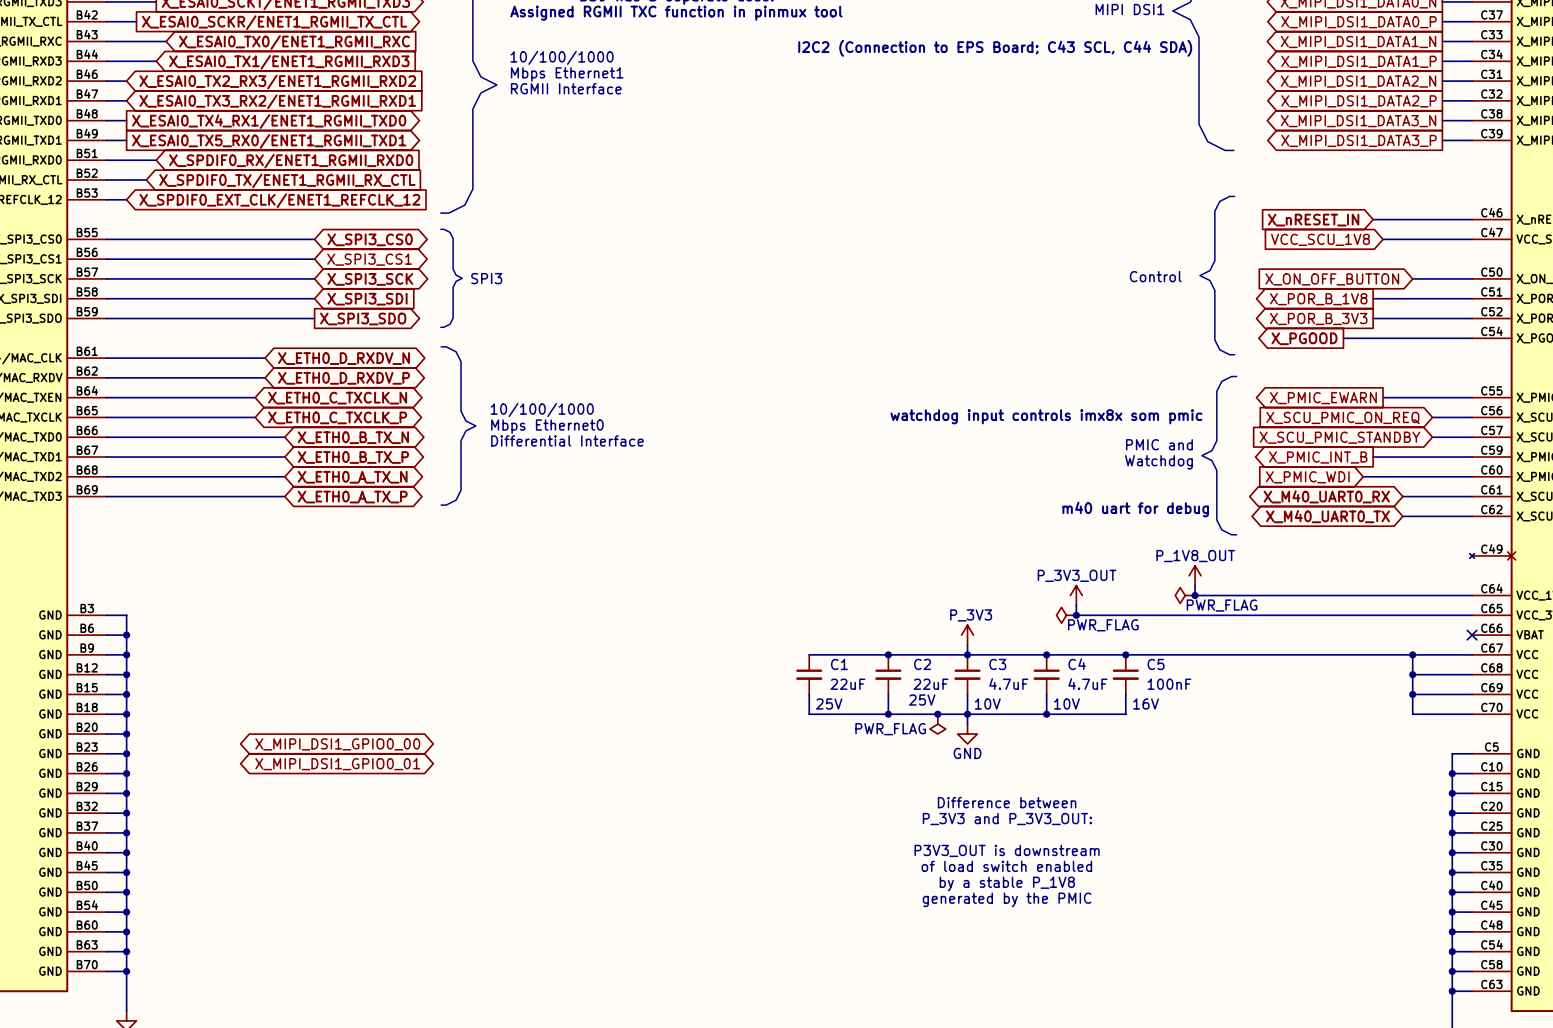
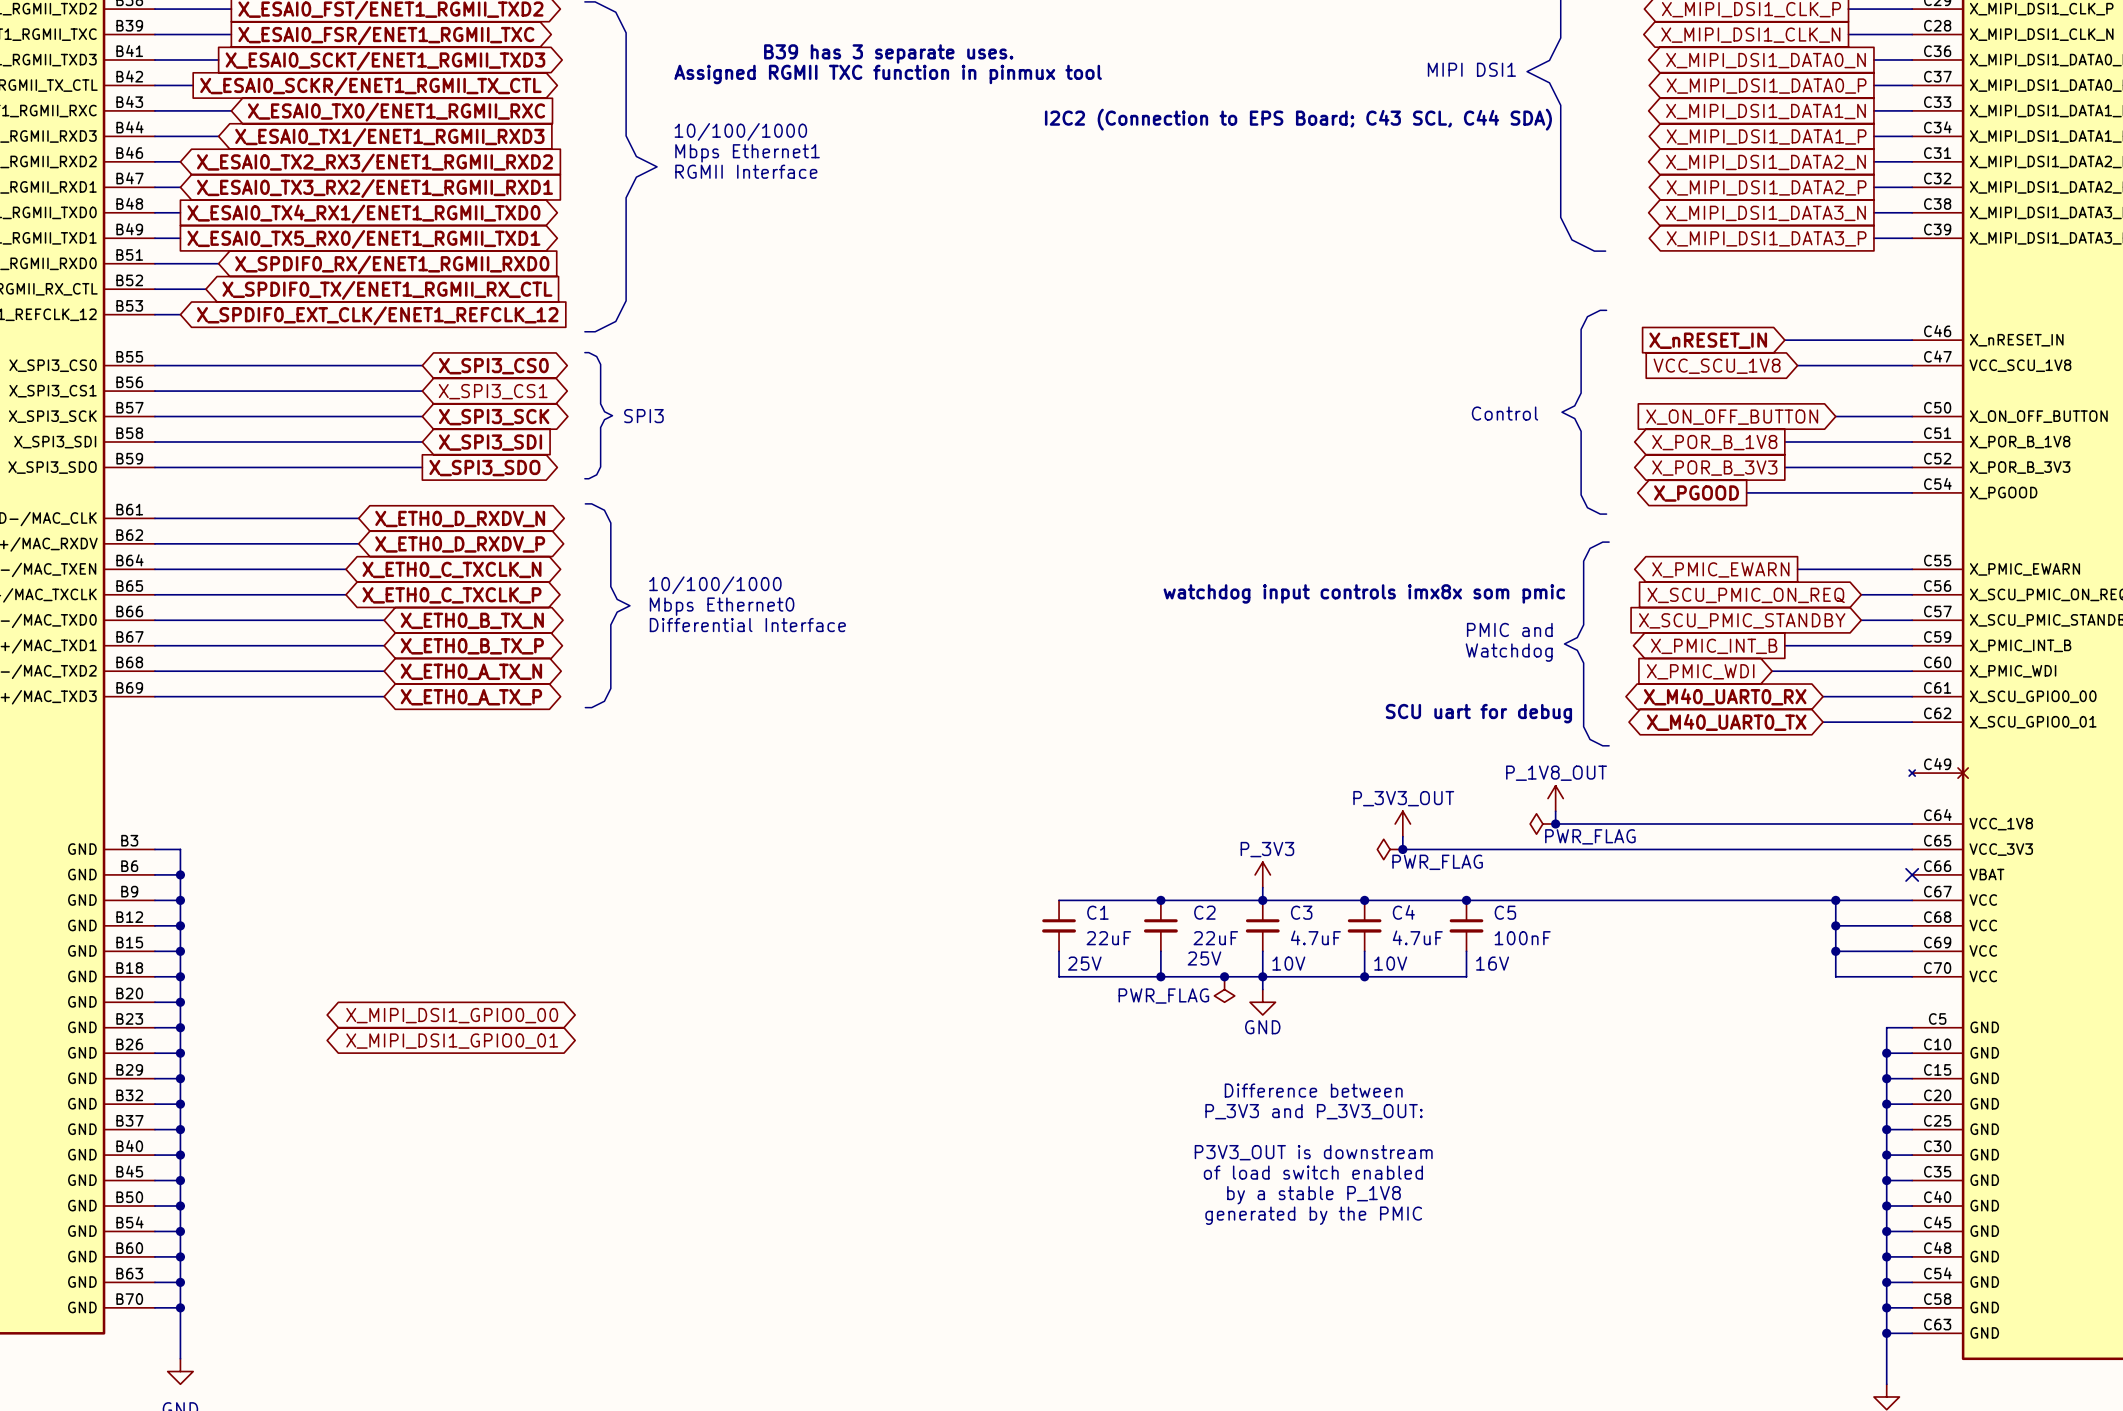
text: m40 uart for debug (1135, 509) -> SCU uart for debug (1478, 713)

